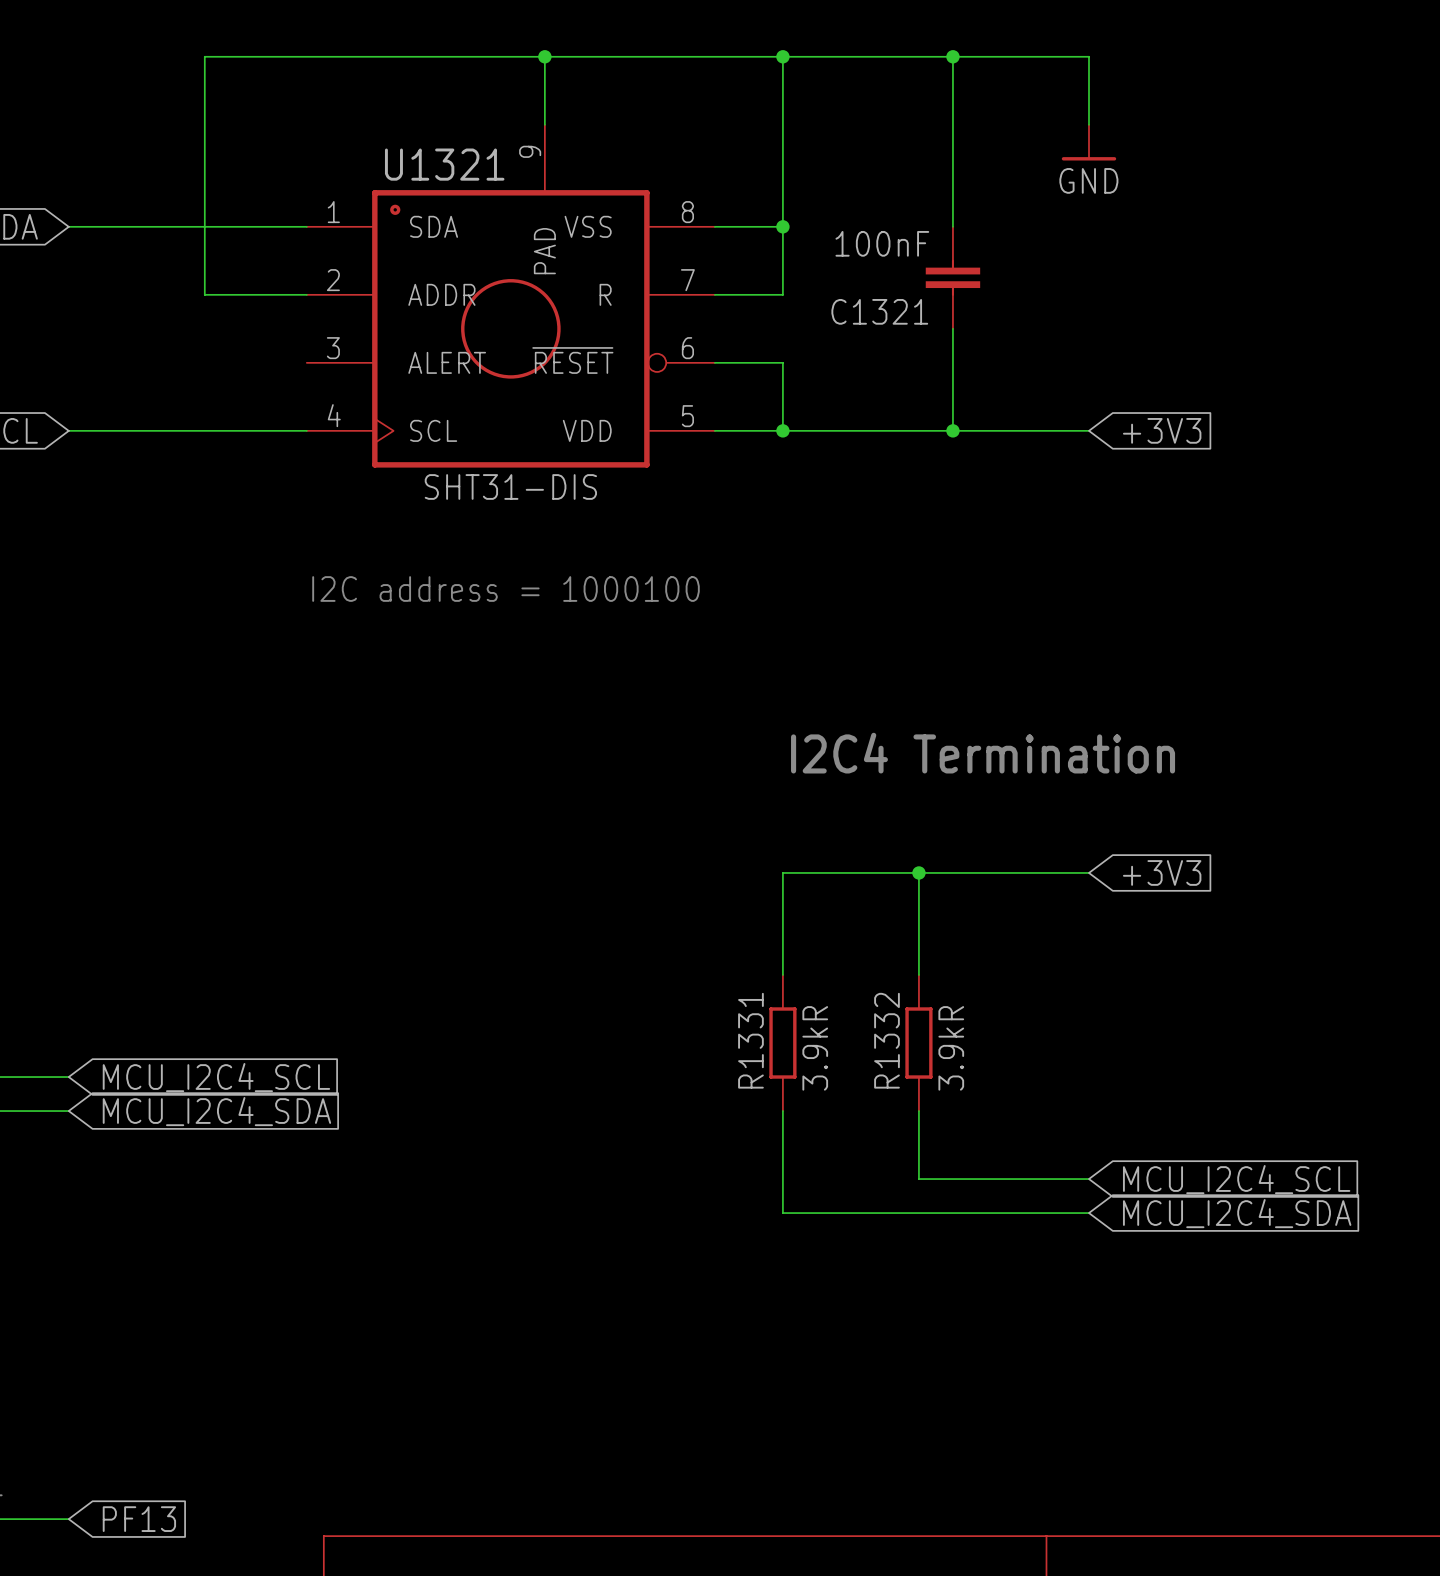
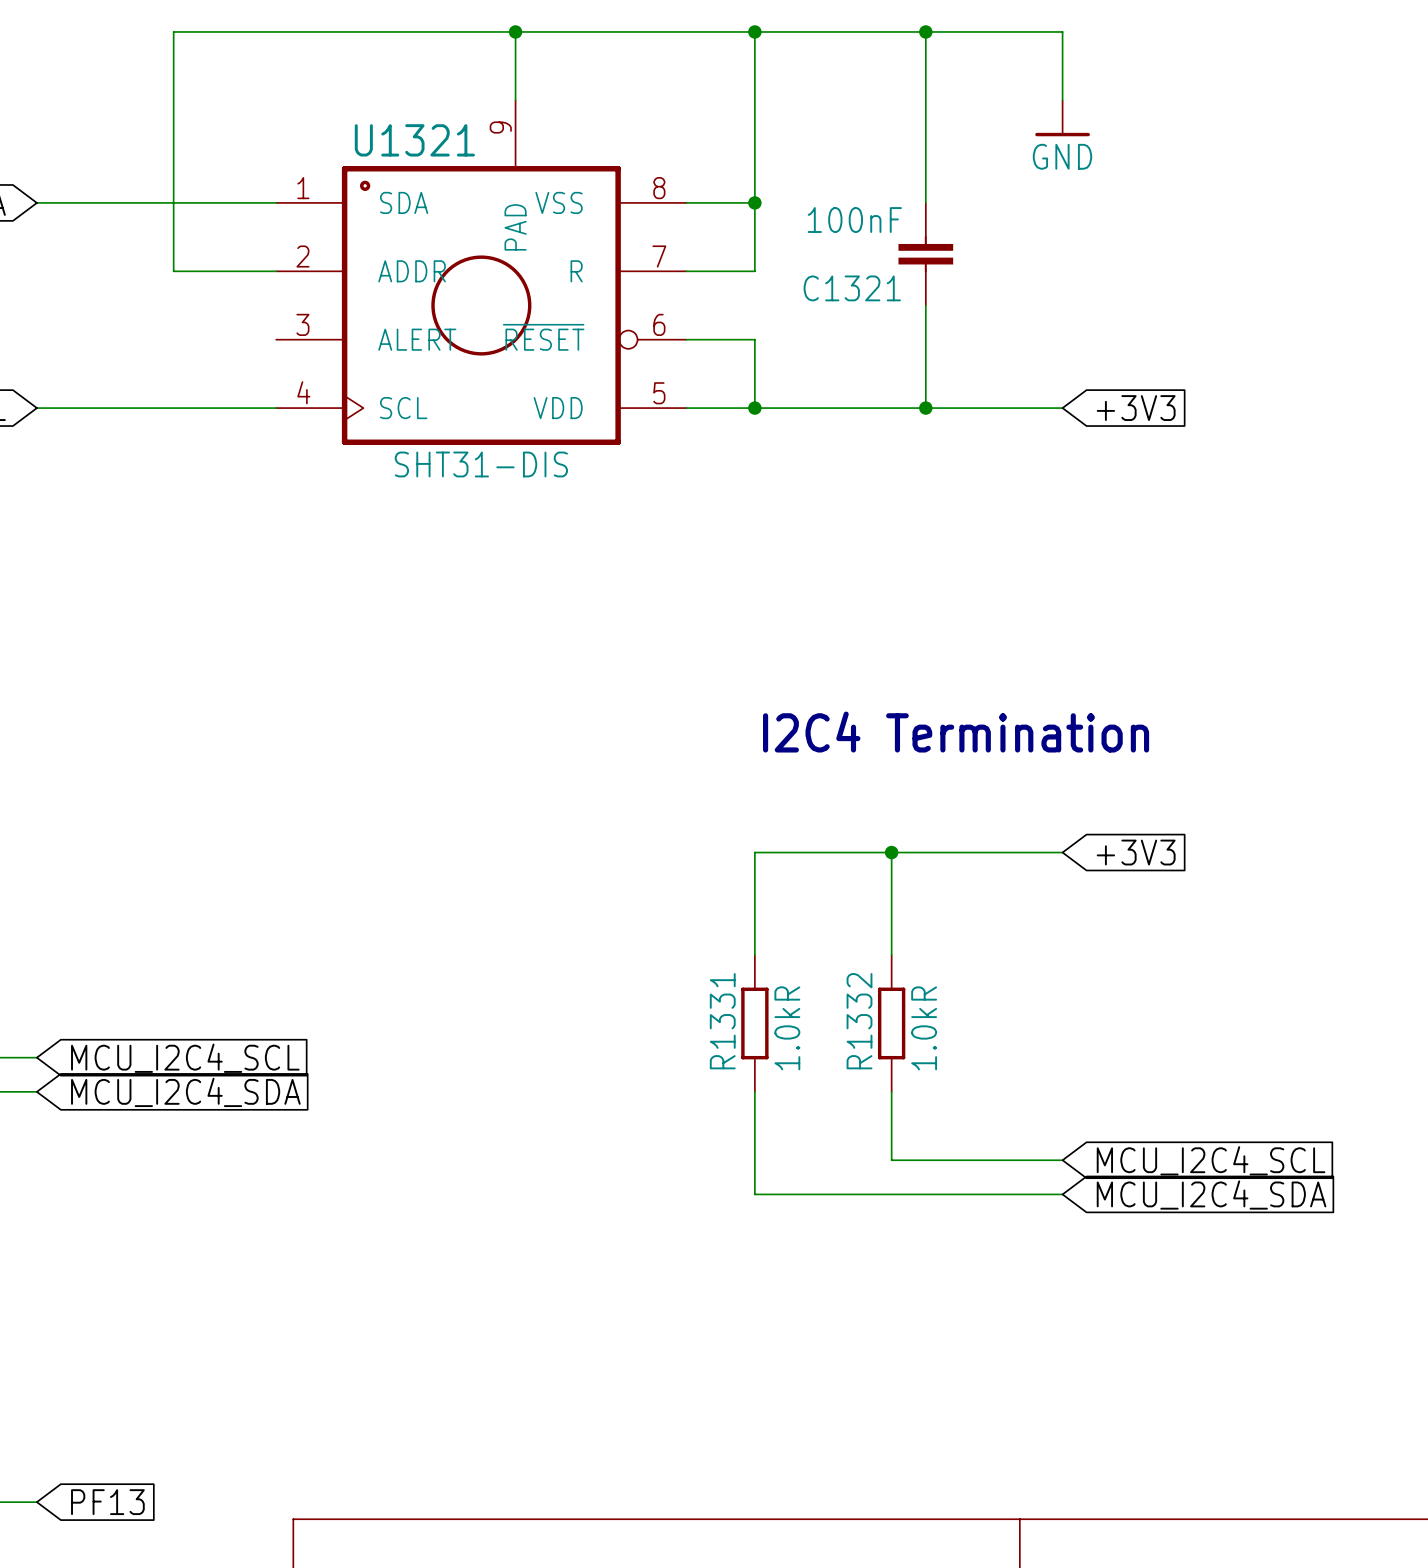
text: I2C address = 1000100 (506, 589) -> none
R1331 value: 3.9kR (815, 1048) -> 1.0kR (787, 1028)
R1332 value: 3.9kR (951, 1048) -> 1.0kR (924, 1028)

